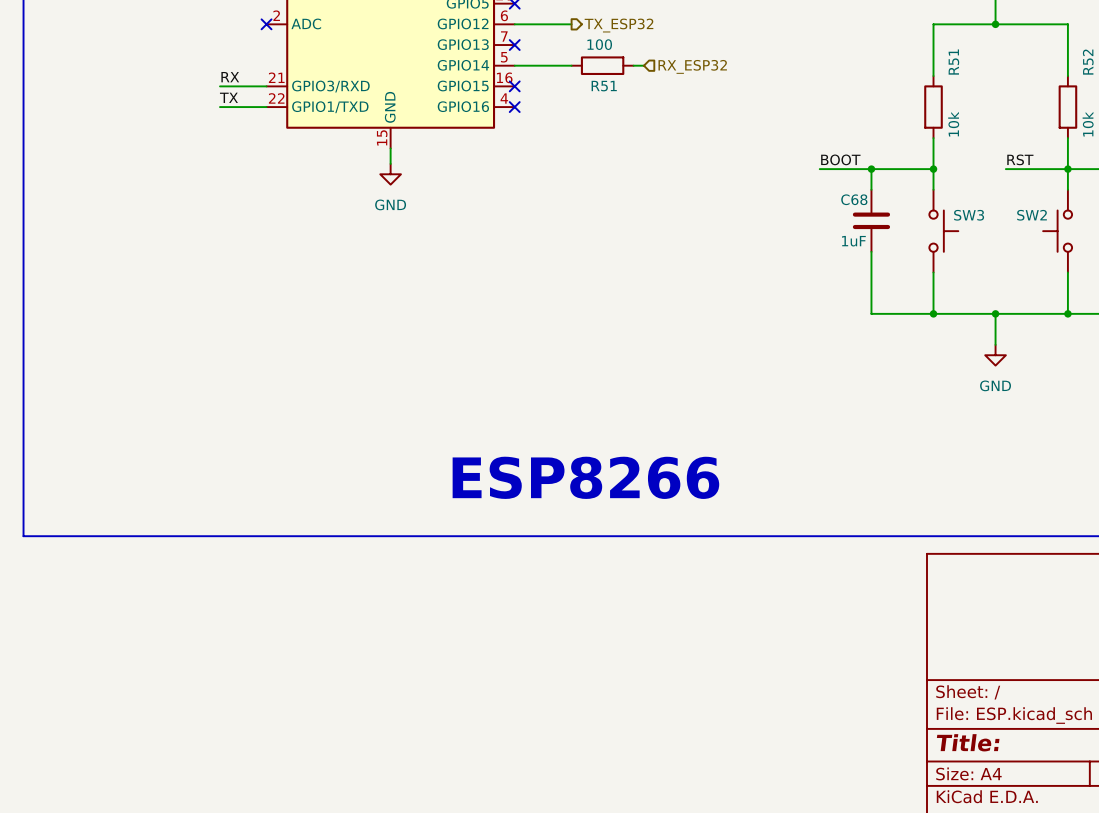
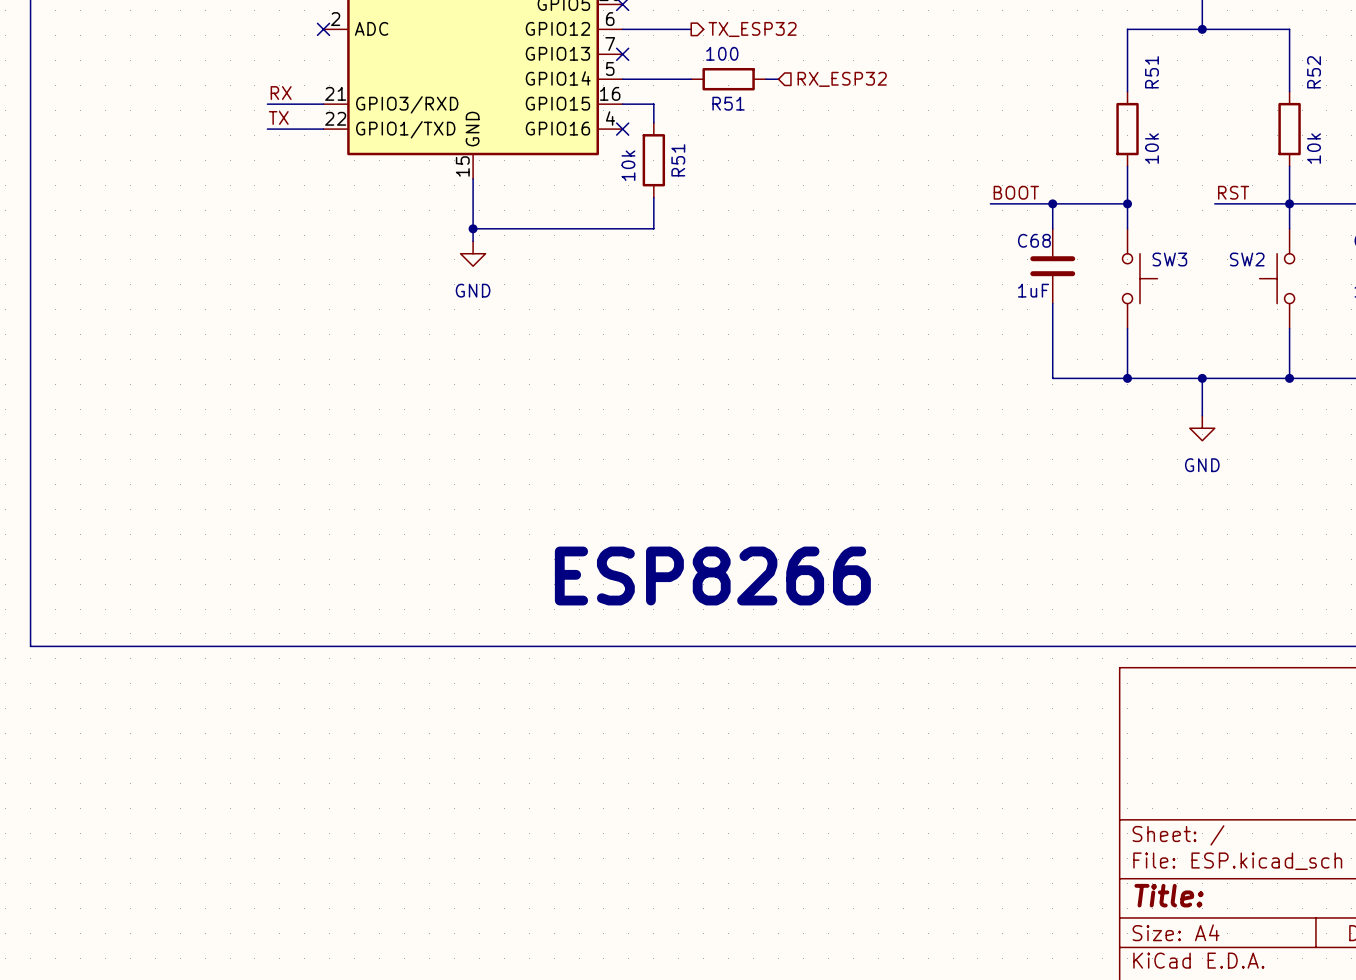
wire: none -> (622, 104) (653, 104) (653, 122)
no-connect mark: (514, 86) -> none
R51: none -> 10k (653, 160)
wire: none -> (473, 197) (473, 241)
wire: none -> (653, 197) (653, 228) (473, 228)
power symbol position: GND (390, 174) -> GND (473, 253)
junction: none -> (473, 228)

